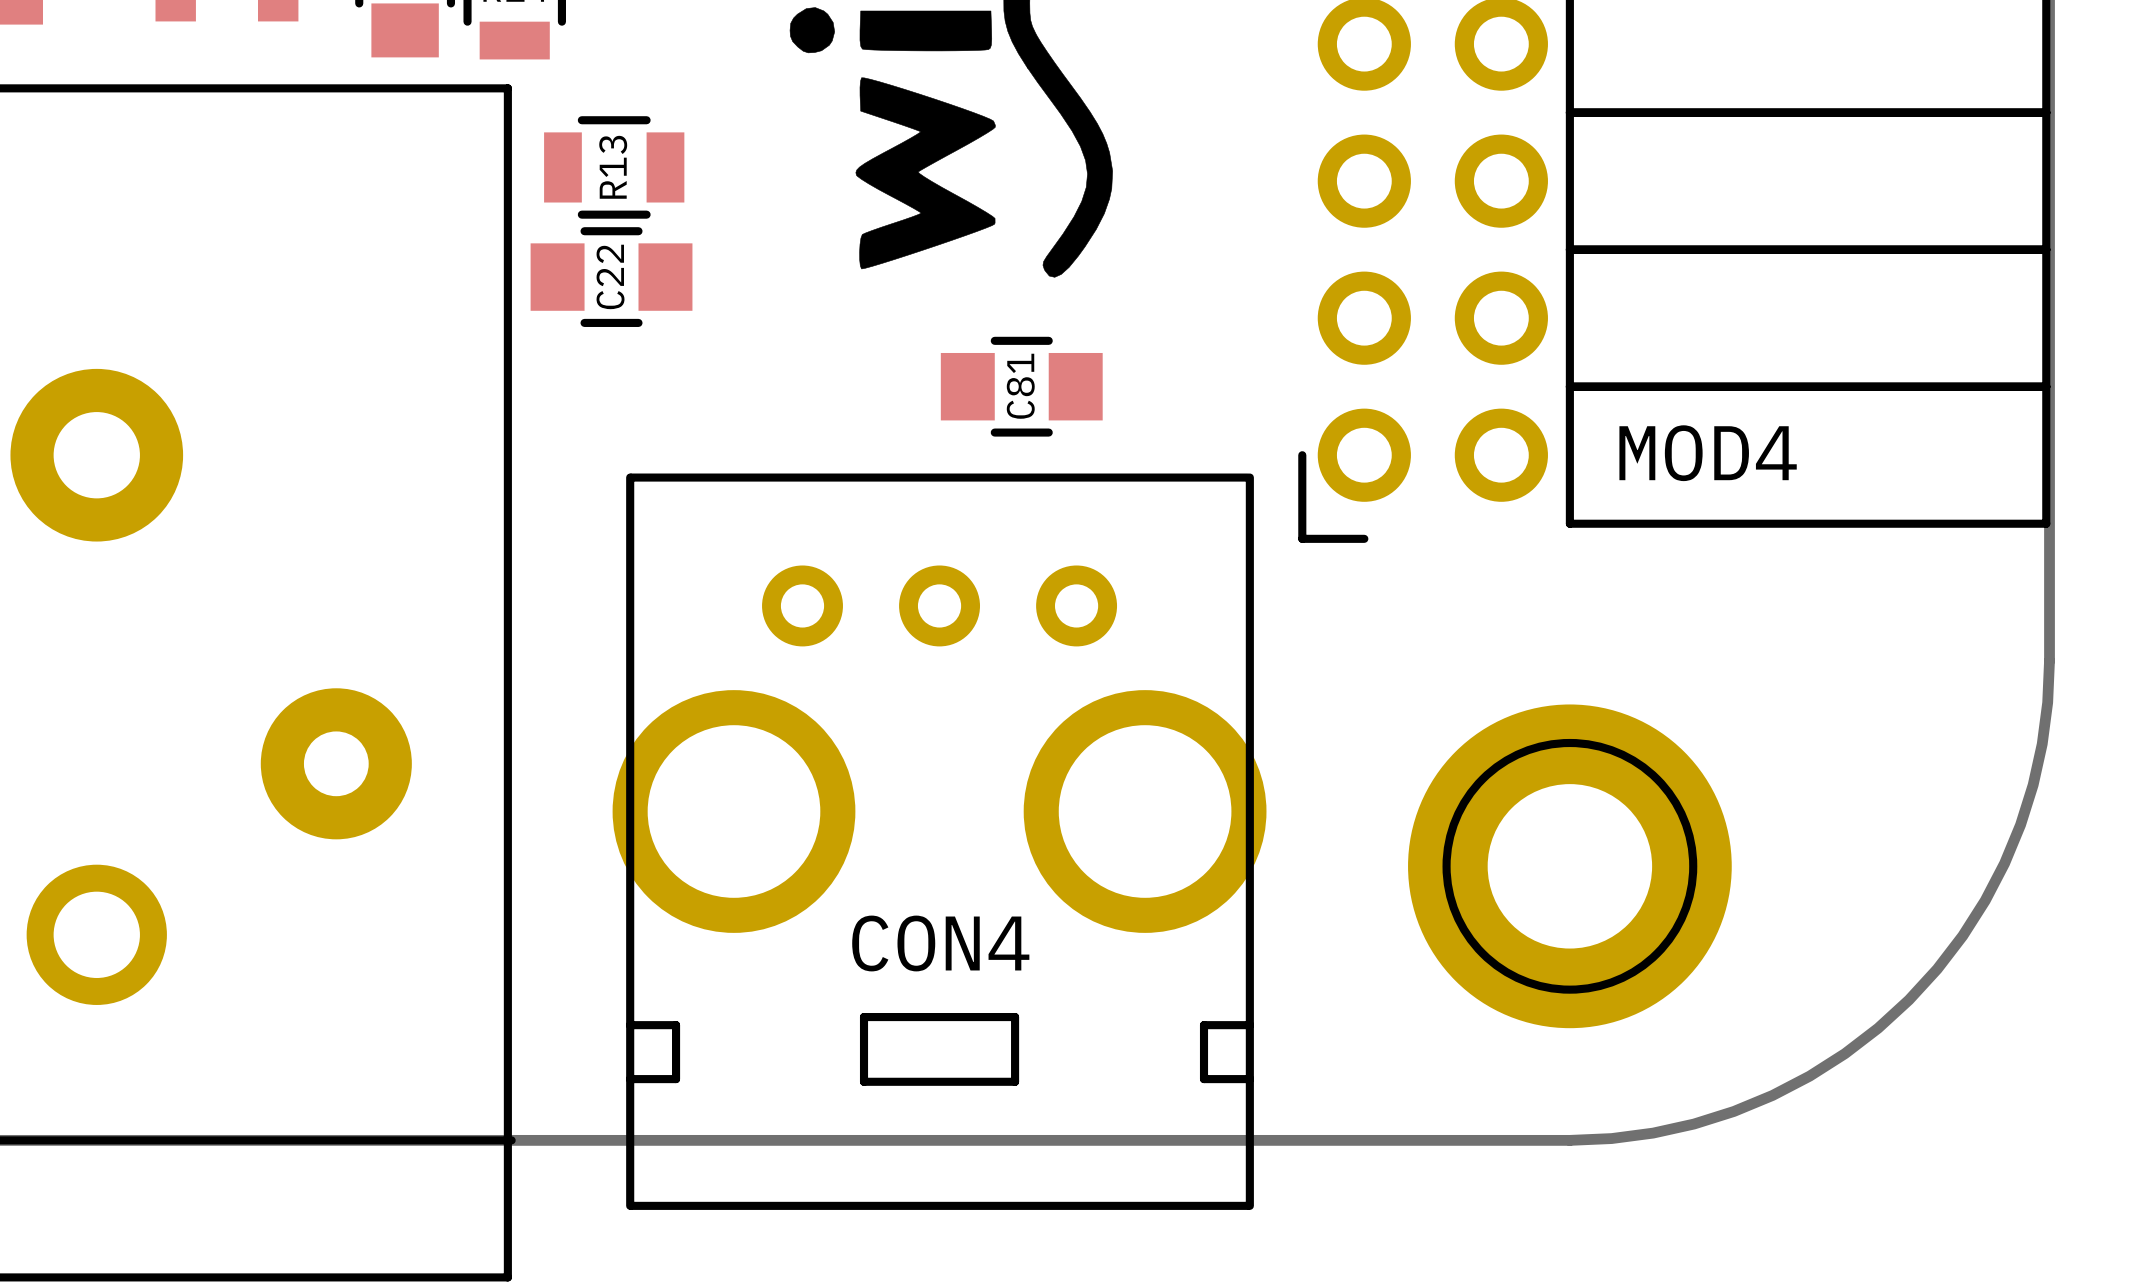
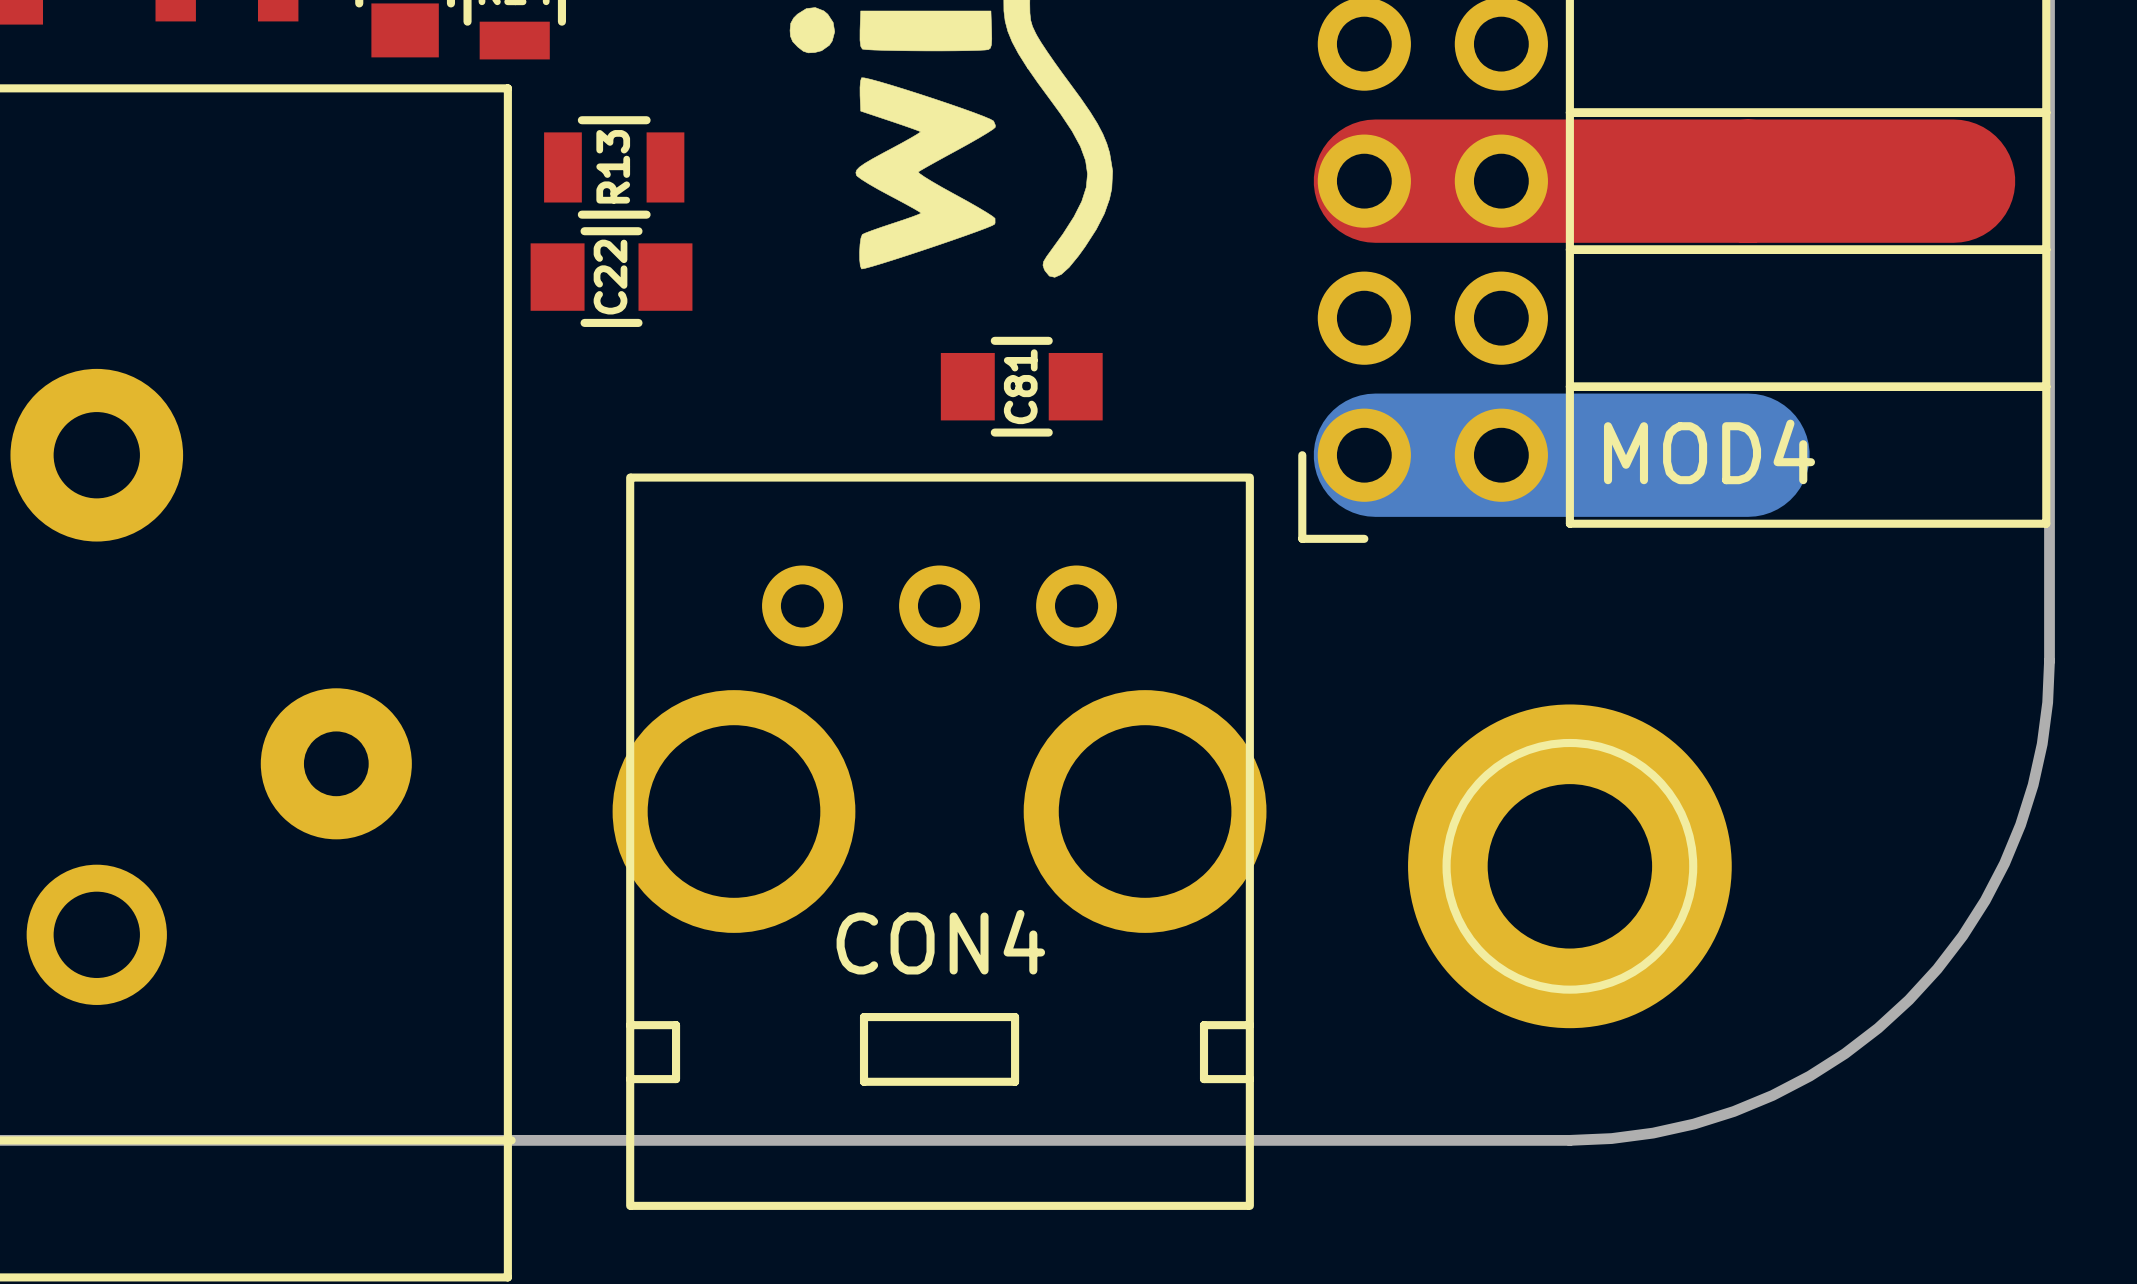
top track: none -> (1375, 181) (1953, 181)
bottom track: none -> (1375, 455) (1748, 455)

